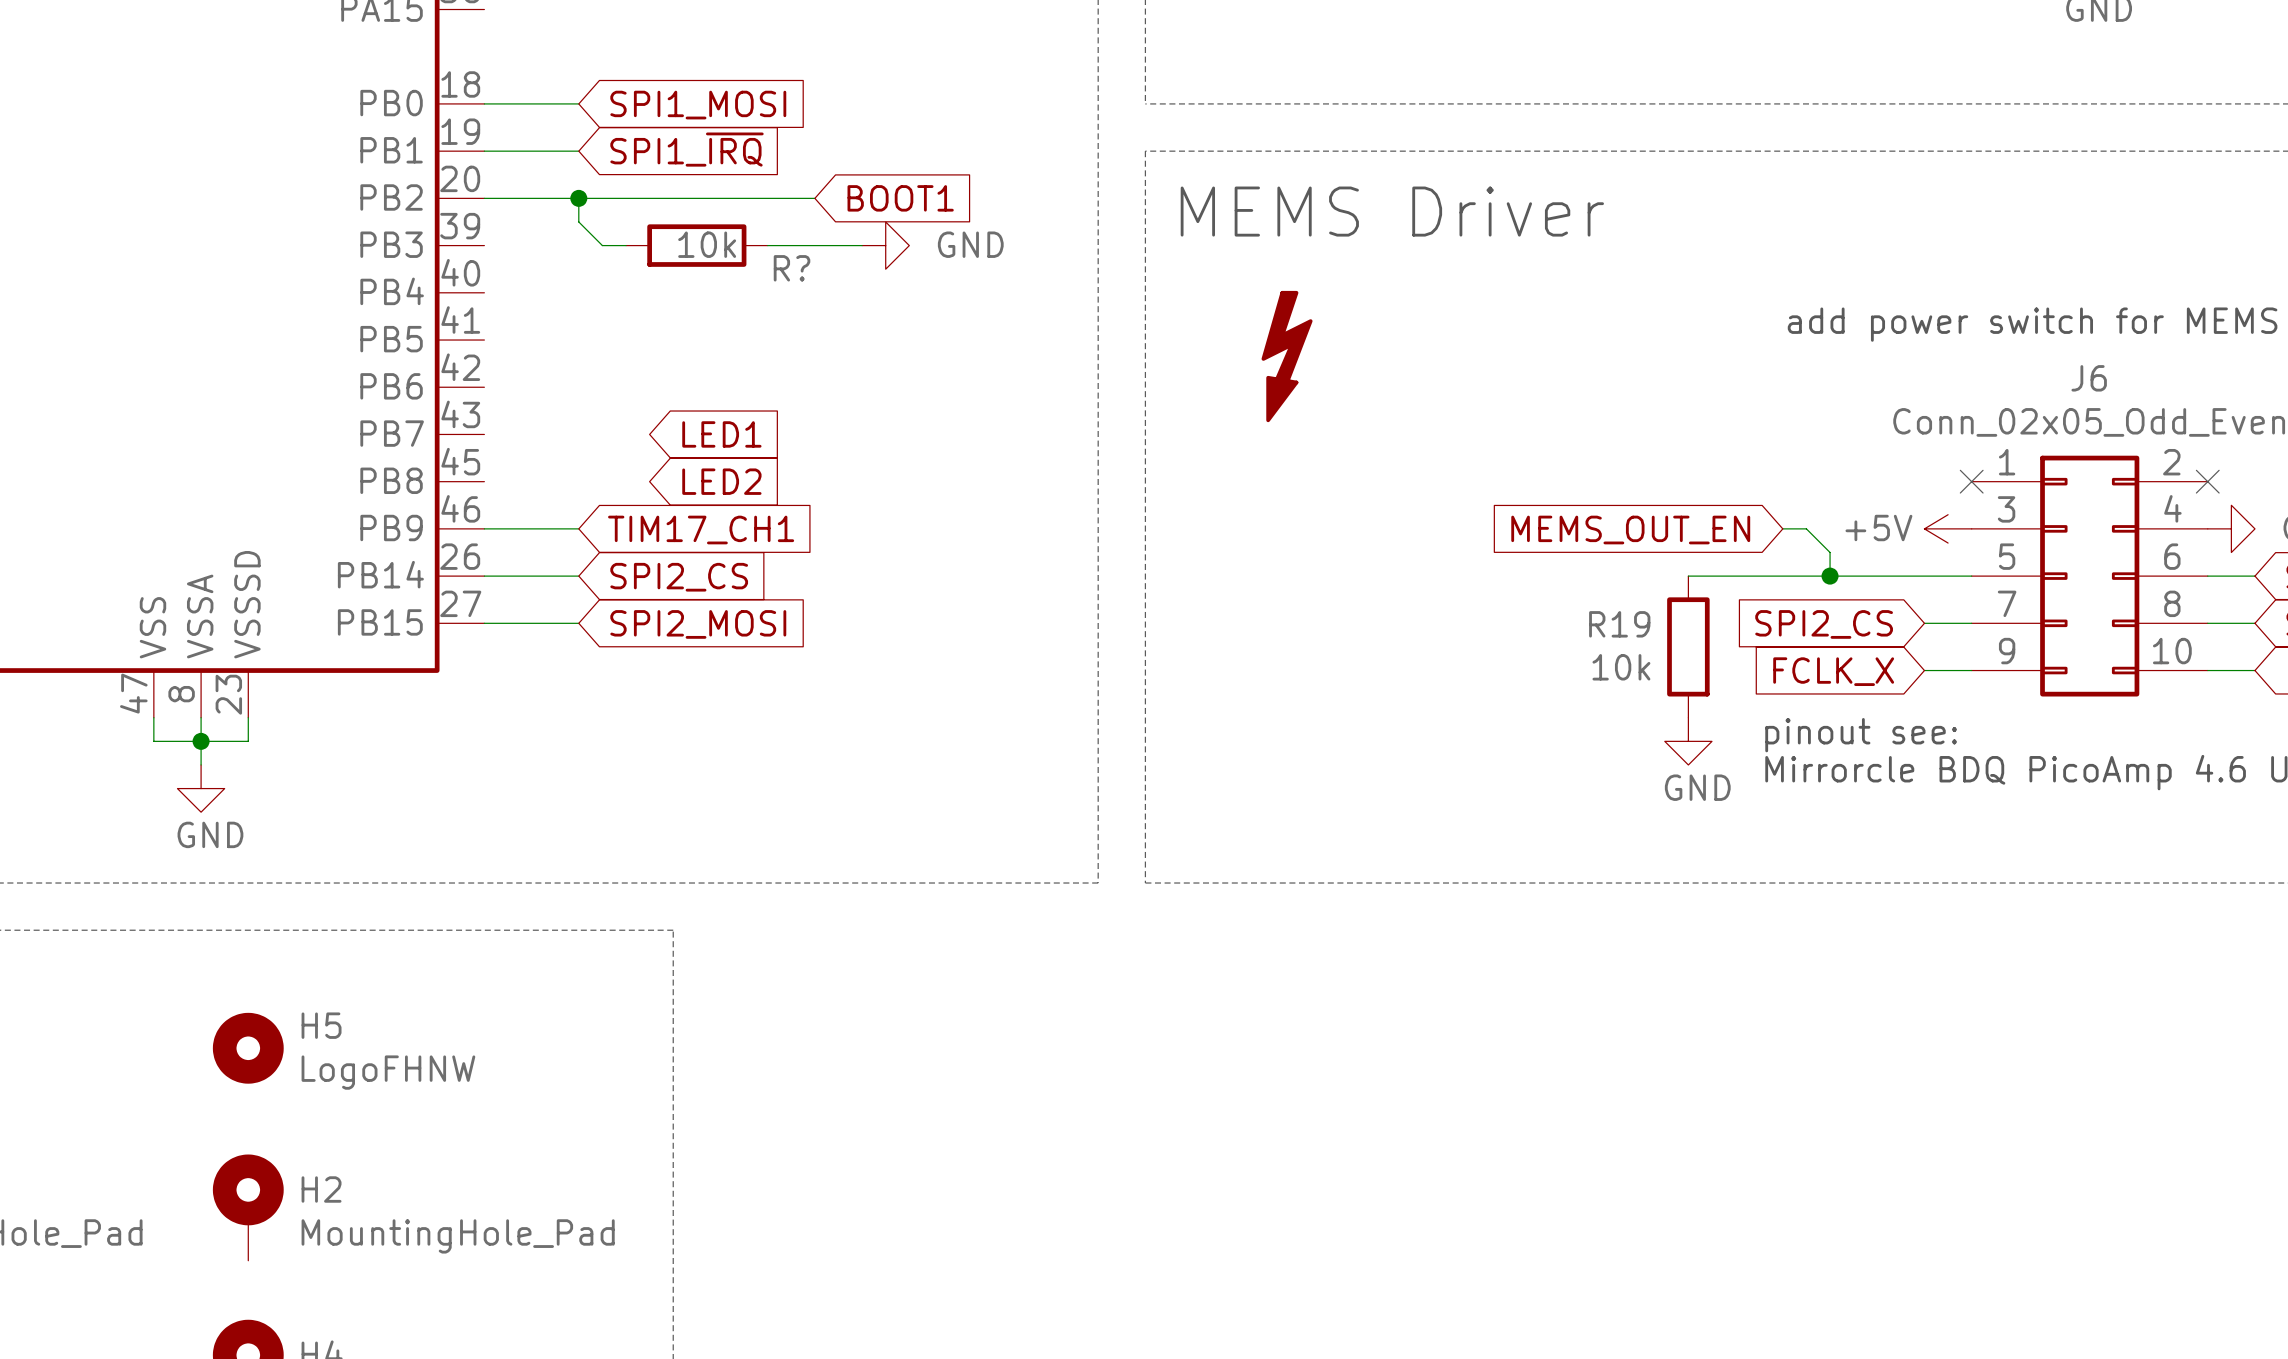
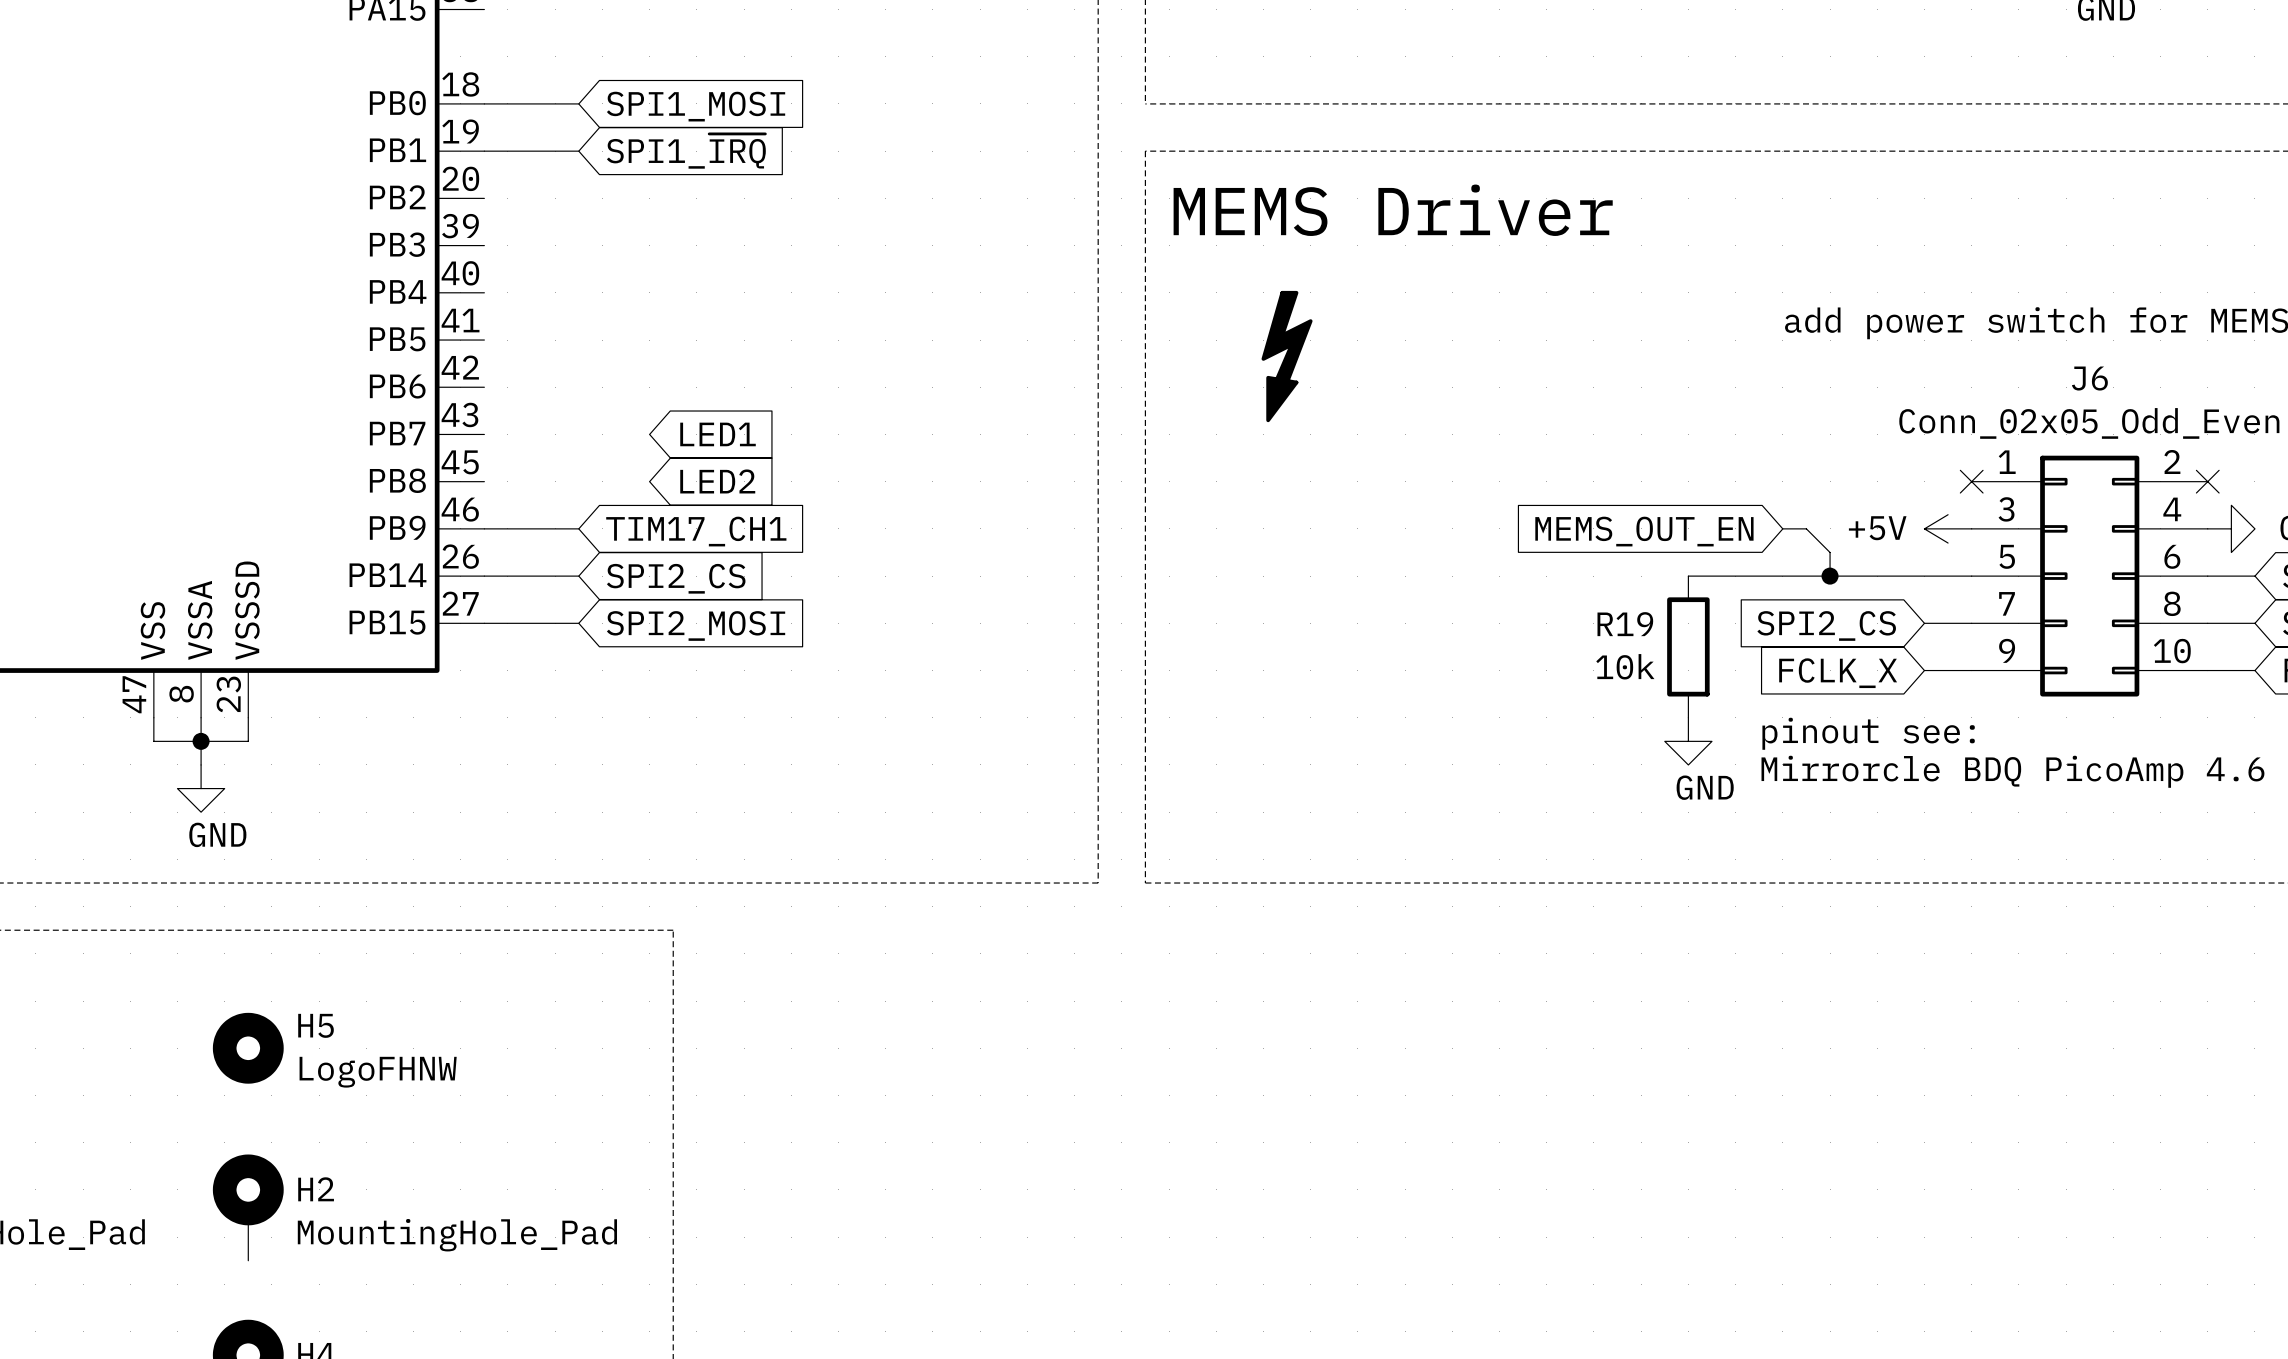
wire: (484, 198) (814, 198) -> none
wire: (578, 198) (578, 221) (602, 245) (626, 245) -> none
junction: (578, 198) -> none
global label: BOOT1 (900, 198) -> none
R?: 10k (696, 245) -> none
wire: (767, 245) (862, 245) -> none
power symbol: GND (885, 245) -> none

